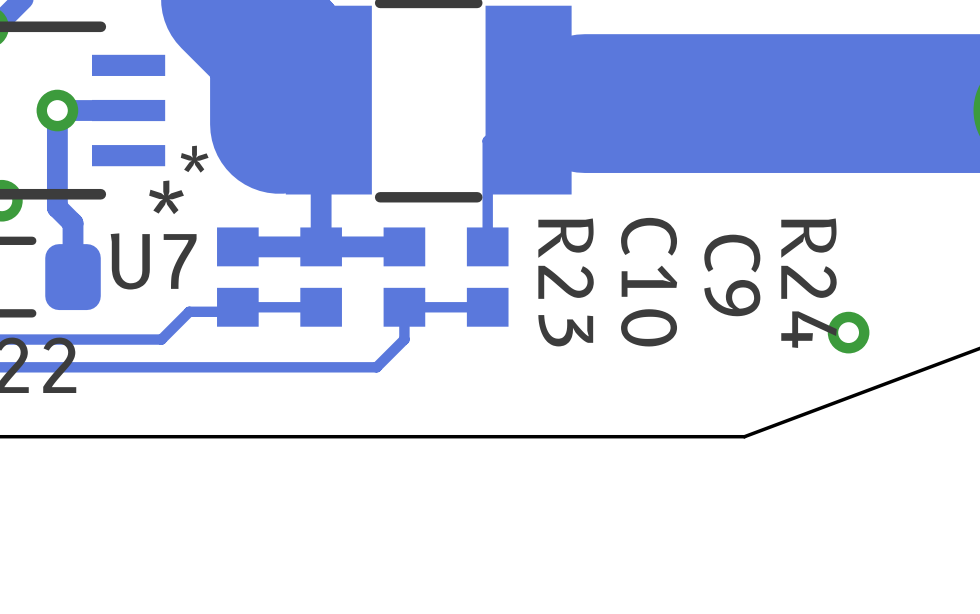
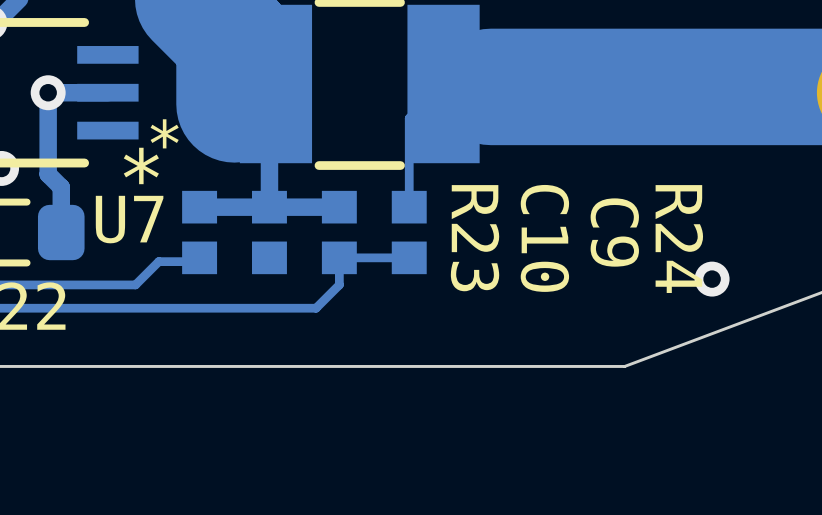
track: (321, 307) (237, 307) -> none

